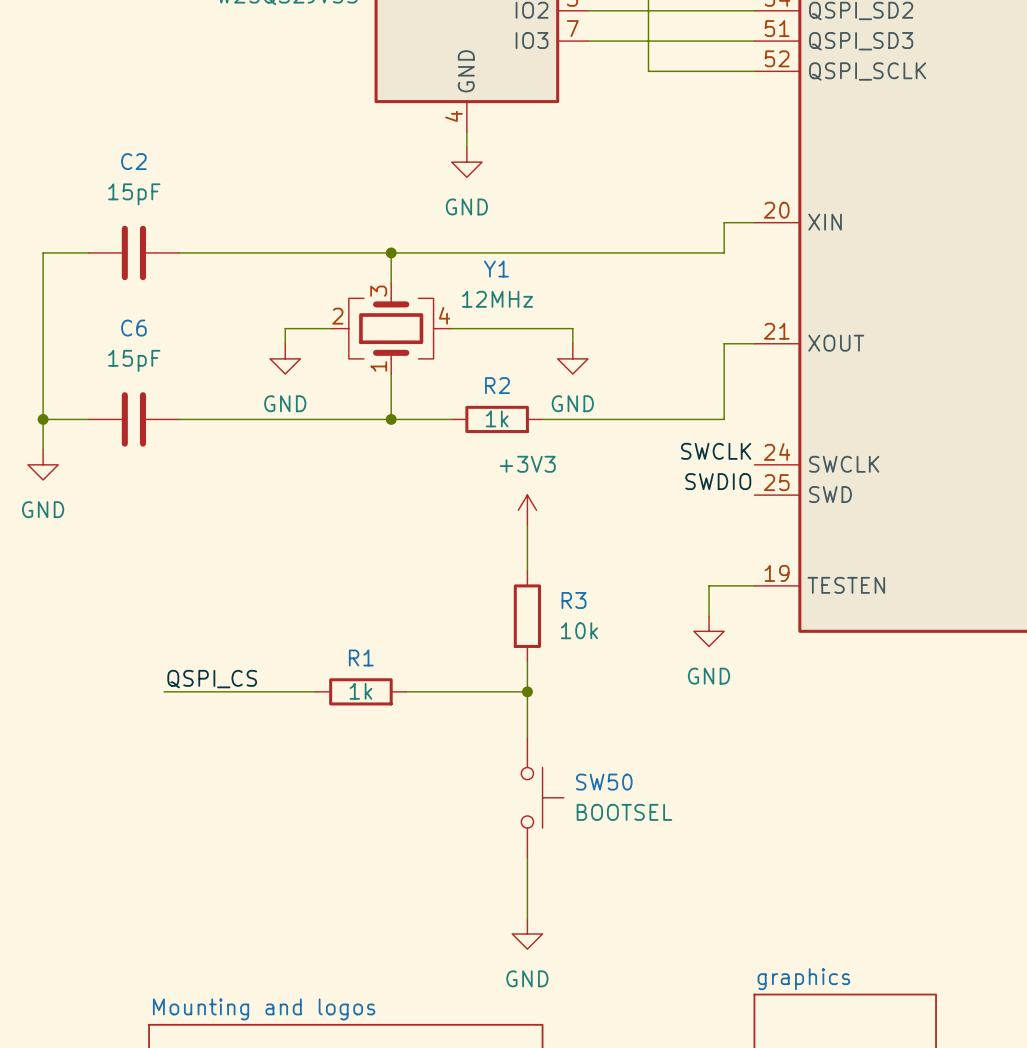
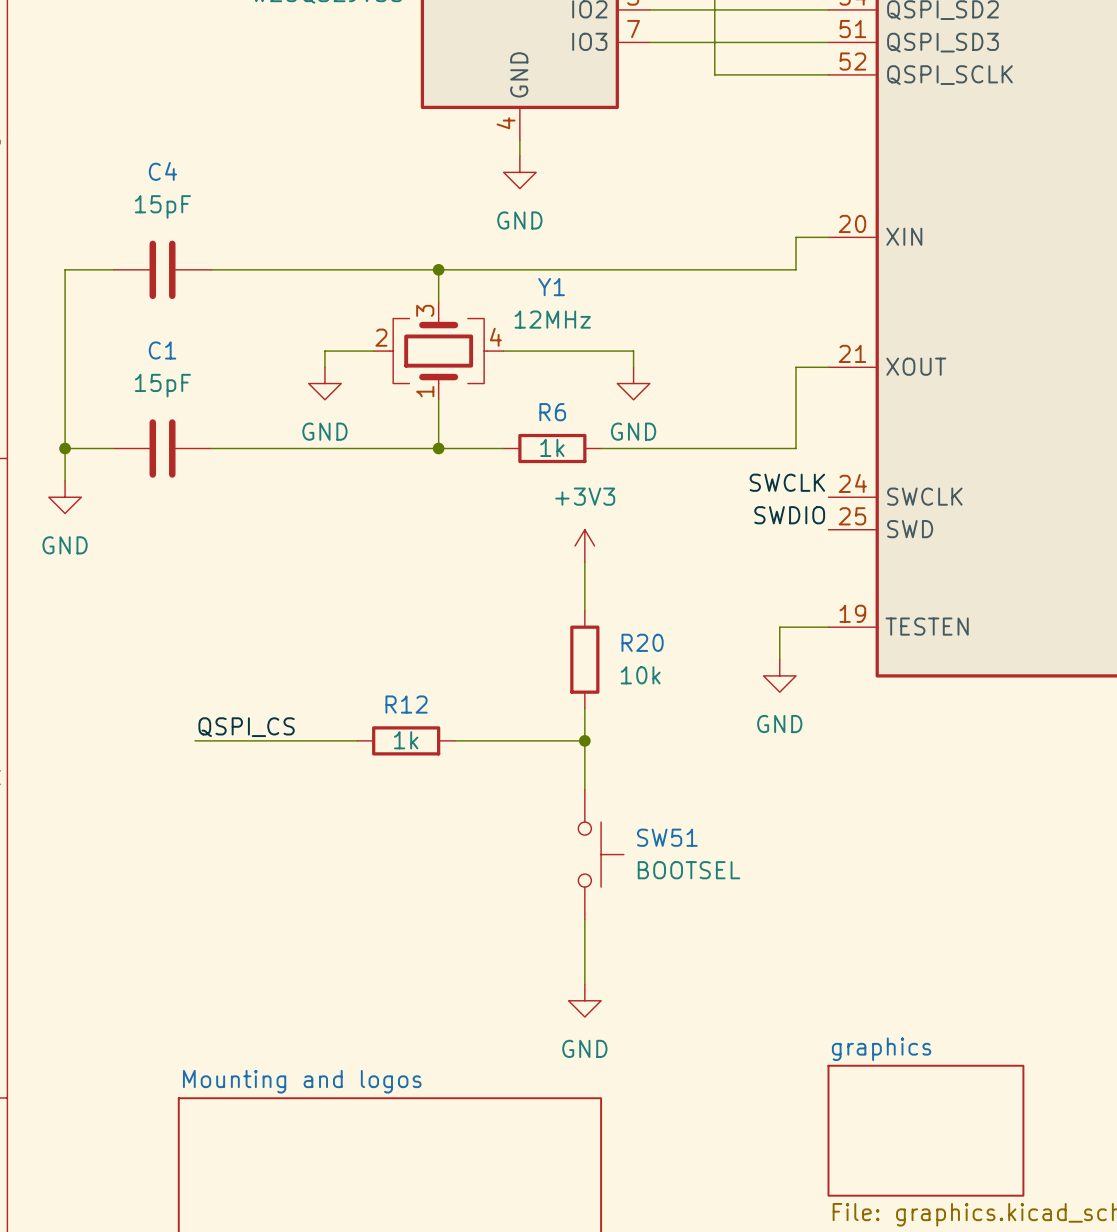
C2 name: C2 (133, 161) -> C4 (162, 171)
C6 name: C6 (133, 328) -> C1 (162, 350)
R2 name: R2 (497, 385) -> R6 (552, 412)
R3 name: R3 (574, 600) -> R20 (642, 642)
R1 name: R1 (361, 657) -> R12 (406, 704)
SW50 name: SW50 (604, 782) -> SW51 (667, 837)

